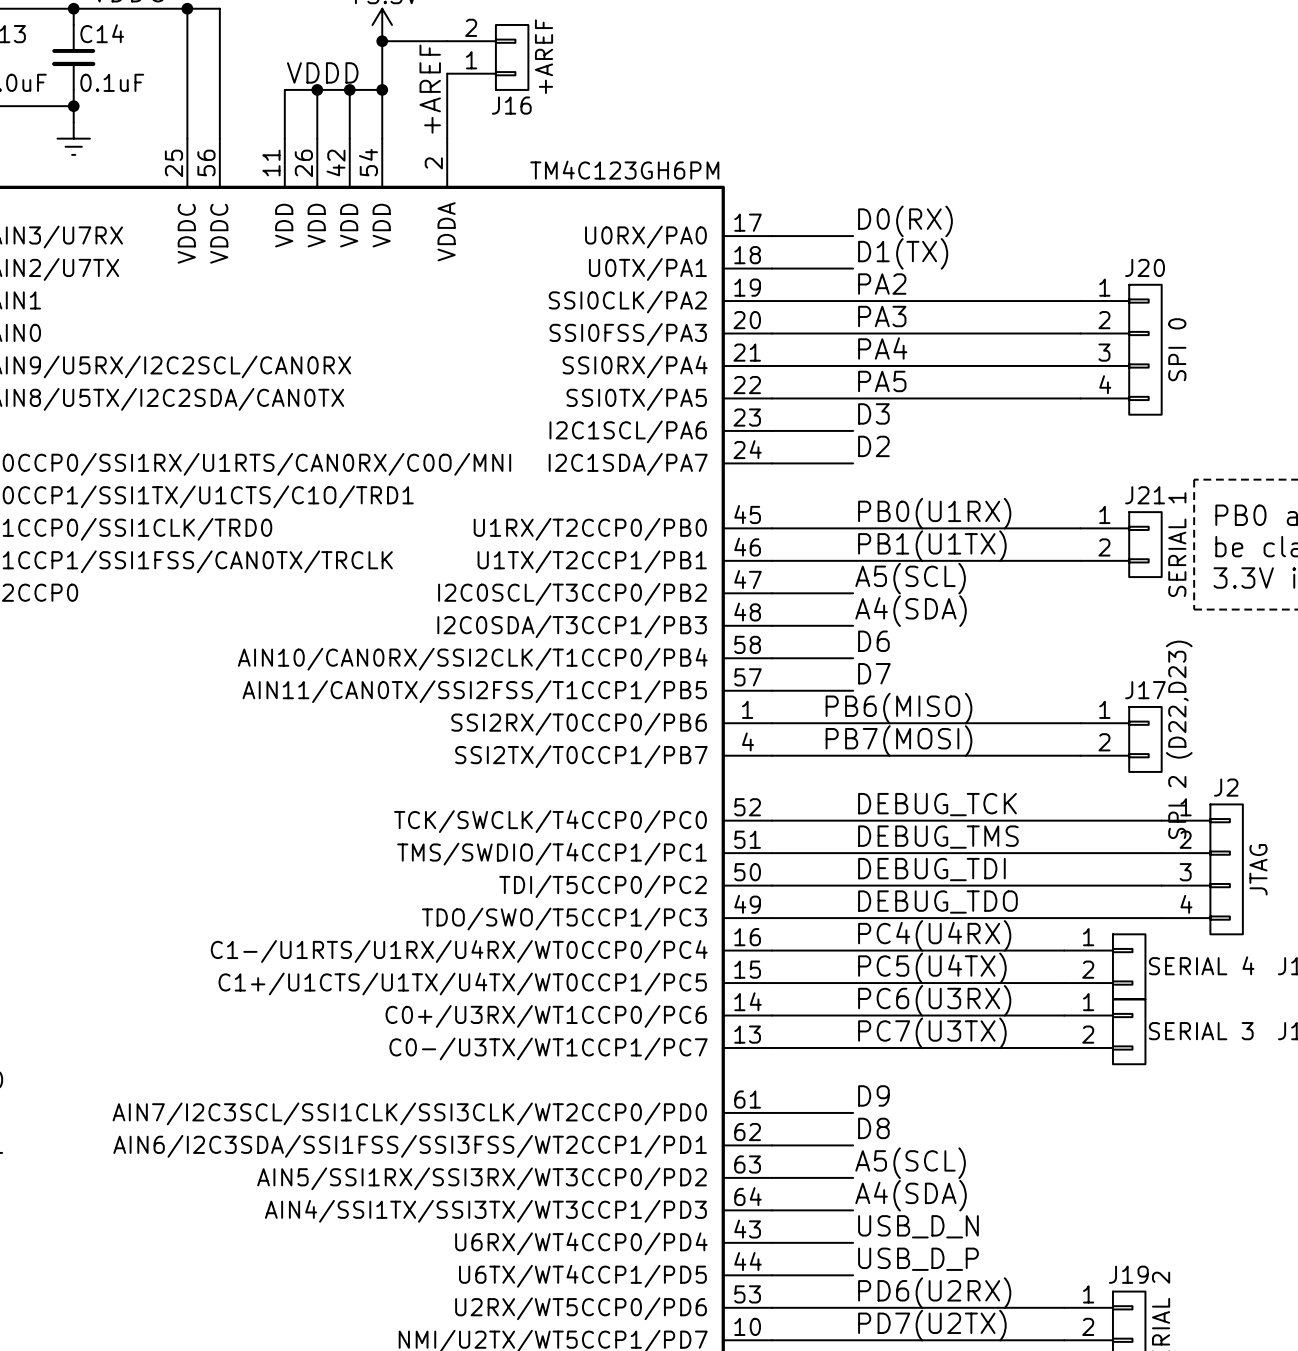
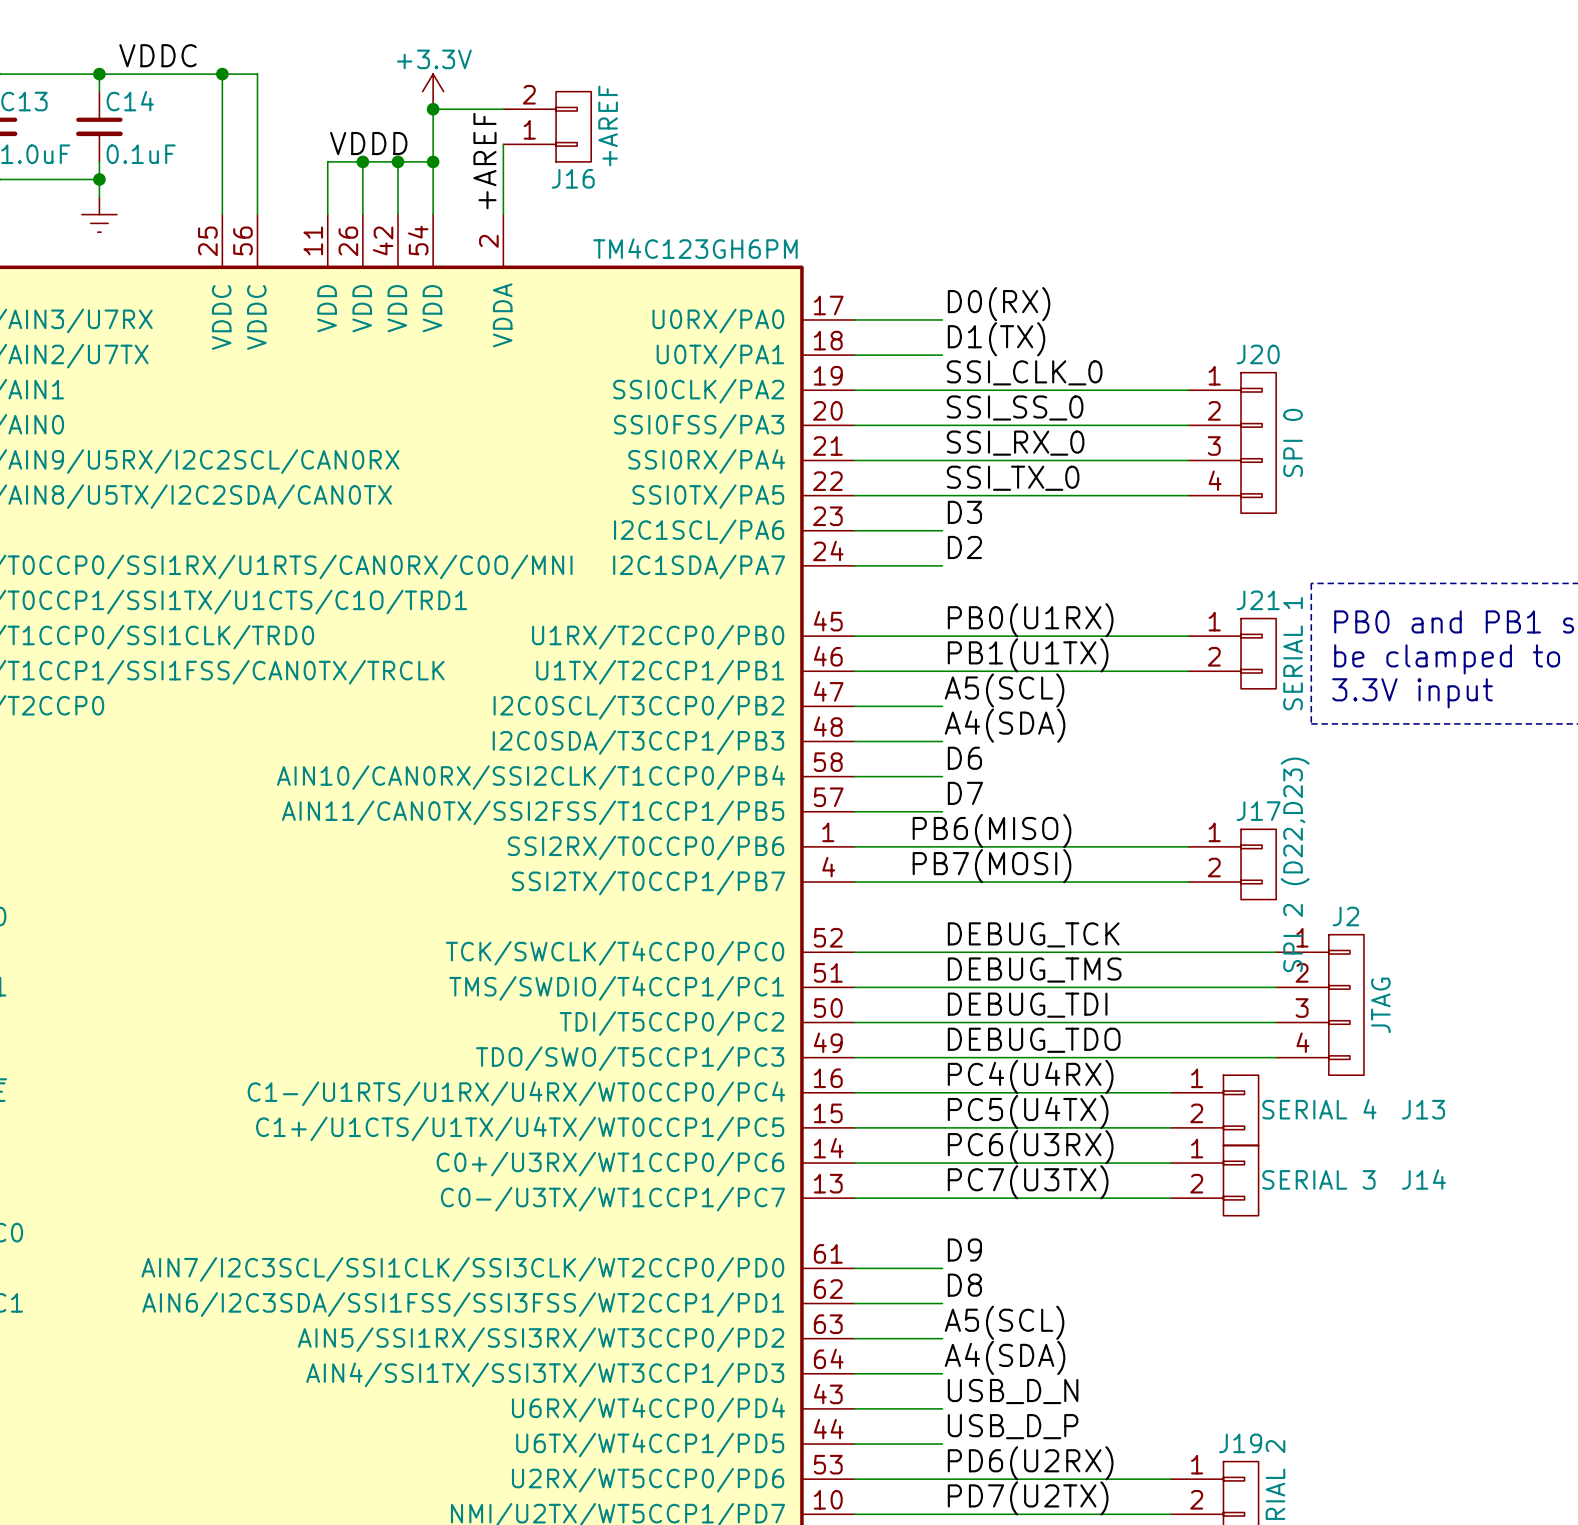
label: PA2 (882, 284) -> SSI_CLK_0 (1024, 372)
label: PA3 (882, 316) -> SSI_SS_0 (1015, 407)
label: PA4 (882, 348) -> SSI_RX_0 (1015, 443)
label: PA5 (882, 381) -> SSI_TX_0 (1013, 478)

